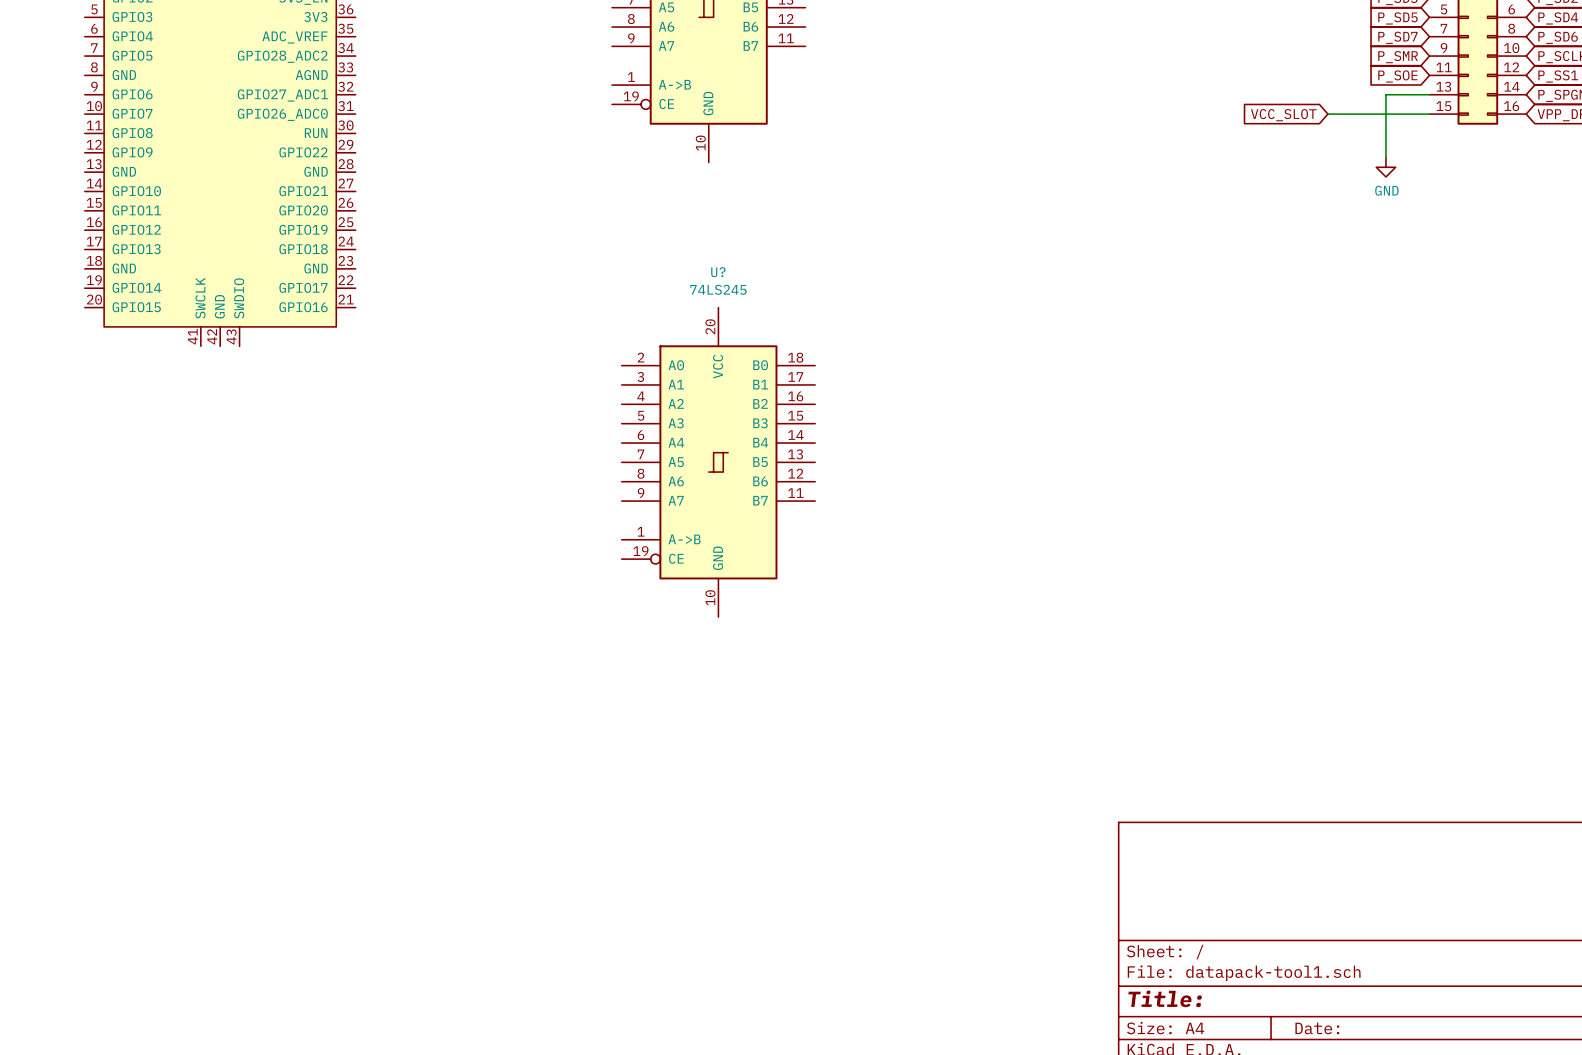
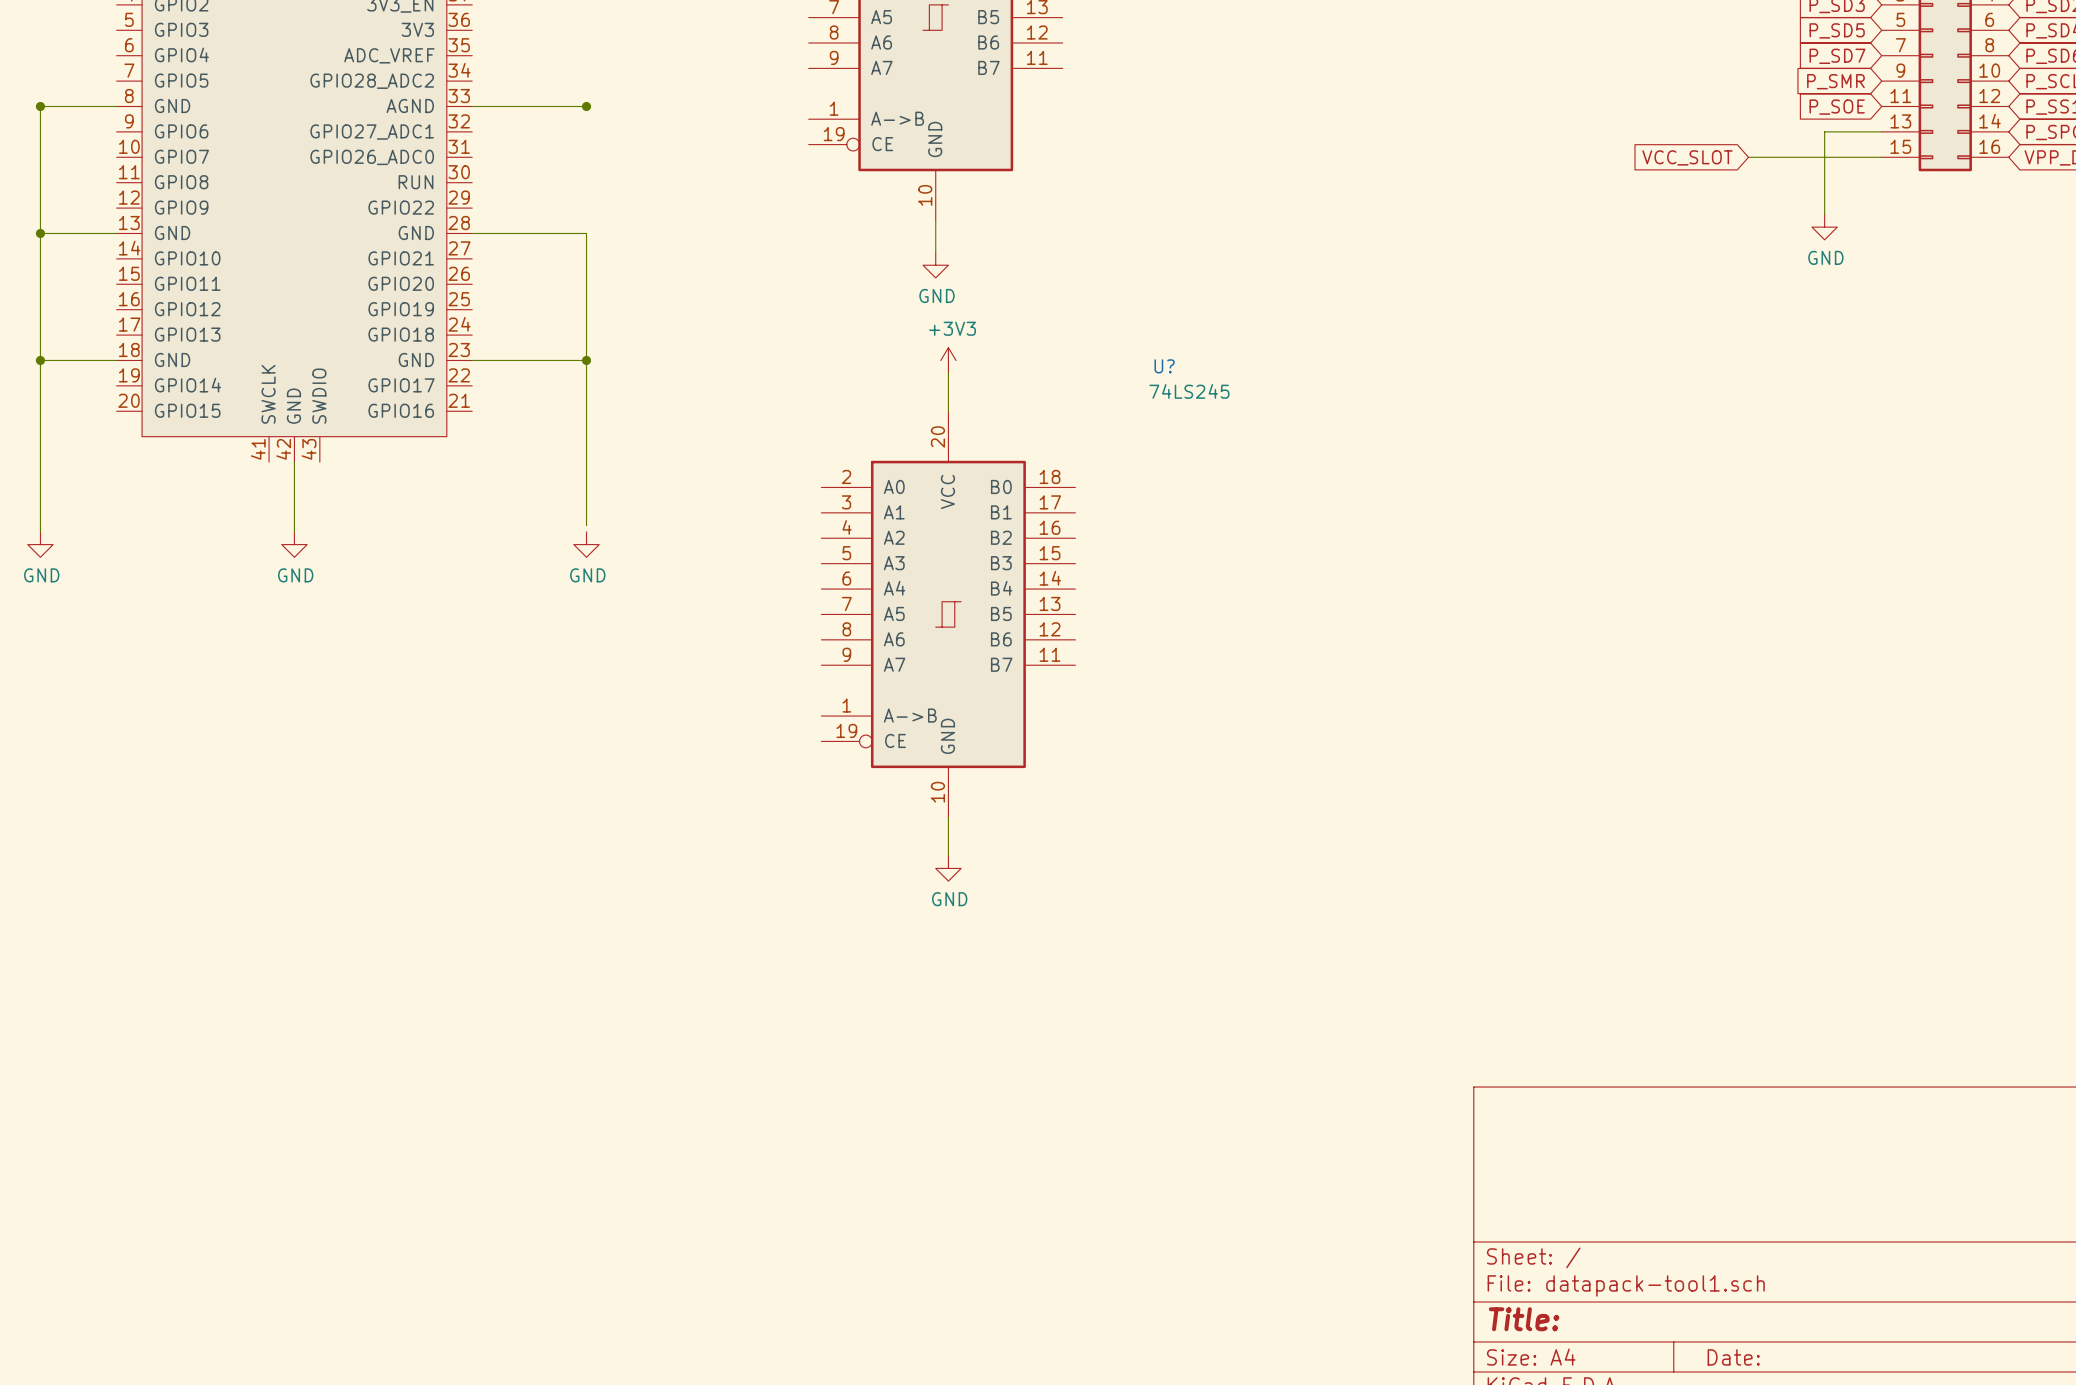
junction: none -> (40, 106)
wire: none -> (116, 106) (40, 106) (40, 531)
wire: none -> (472, 106) (586, 106)
junction: none -> (586, 106)
wire: none -> (935, 220) (935, 252)
wire: none -> (40, 233) (116, 233)
junction: none -> (40, 233)
wire: none -> (472, 233) (586, 233) (586, 525)
power symbol: none -> GND (935, 265)
wire: none -> (40, 360) (116, 360)
junction: none -> (40, 360)
wire: none -> (472, 360) (586, 360)
junction: none -> (586, 360)
power symbol: none -> +3V3 (948, 360)
U? name position: U? (718, 272) -> U? (1164, 366)
wire: none -> (948, 373) (948, 411)
U? value position: 74LS245 (718, 289) -> 74LS245 (1189, 391)
wire: none -> (294, 462) (294, 531)
power symbol: none -> GND (40, 544)
power symbol: none -> GND (294, 544)
power symbol: none -> GND (586, 544)
wire: none -> (948, 817) (948, 855)
power symbol: none -> GND (948, 868)

